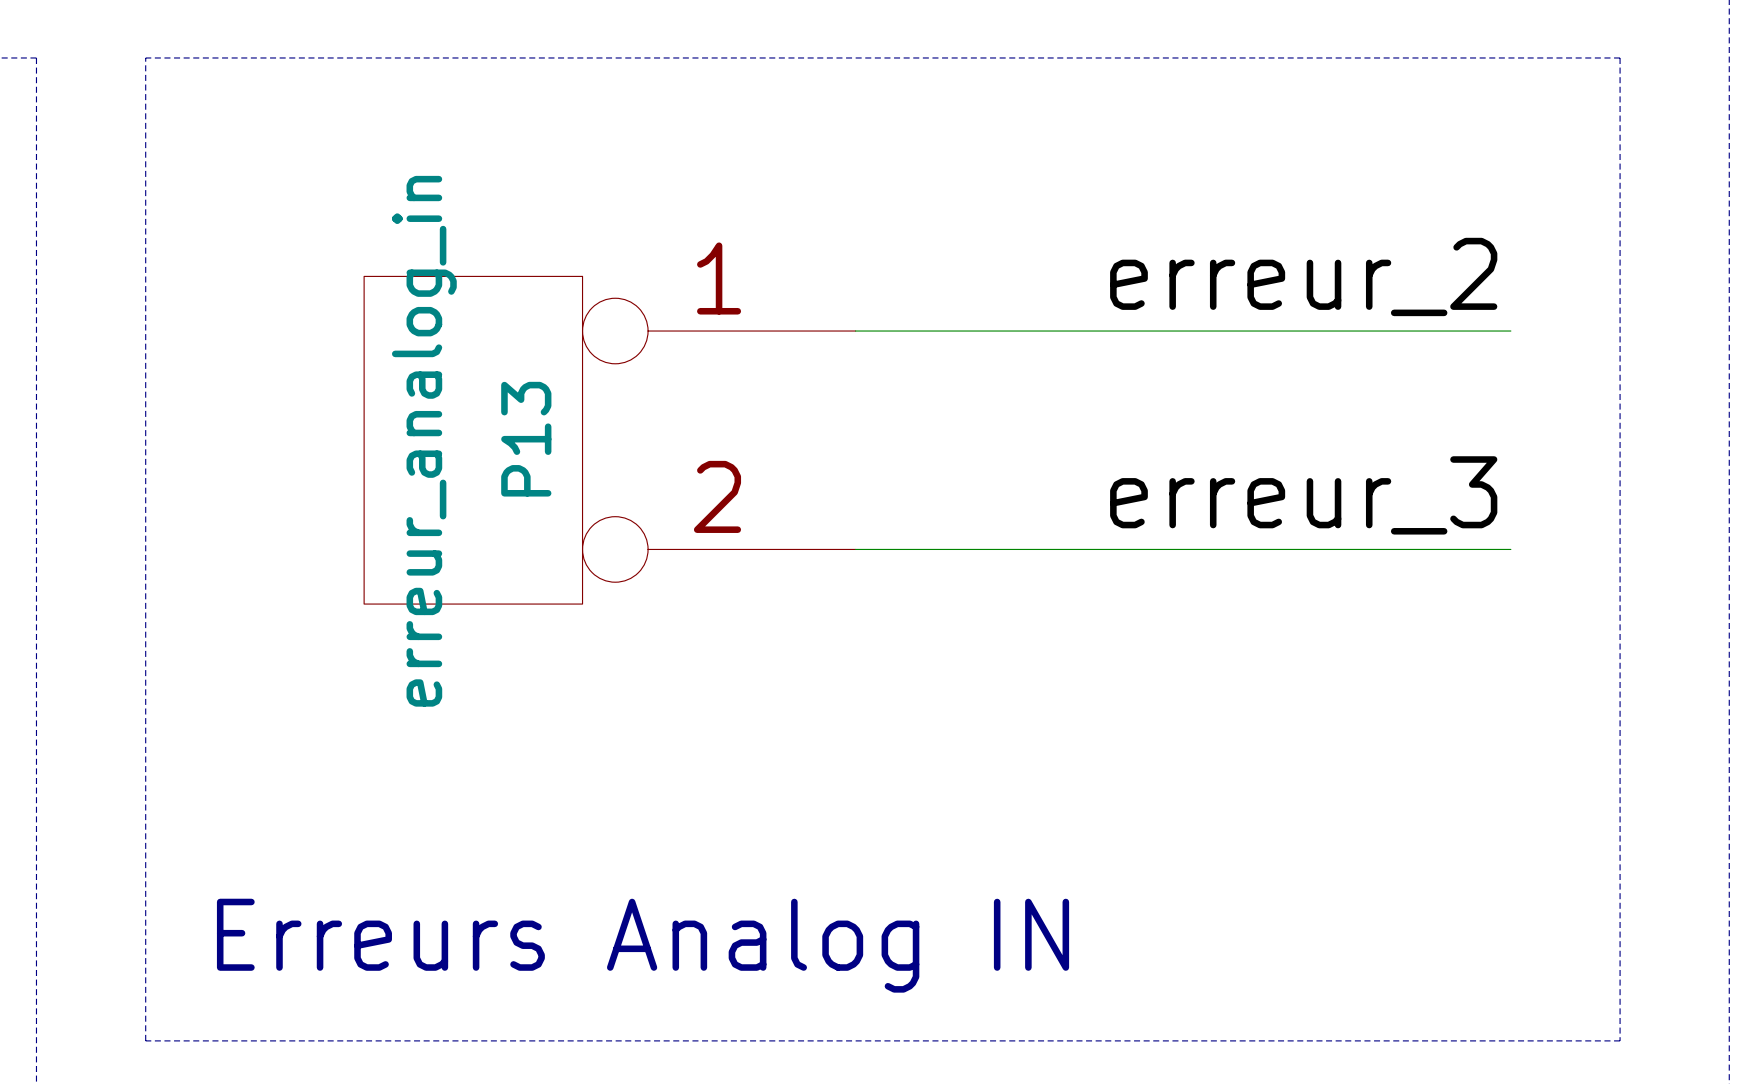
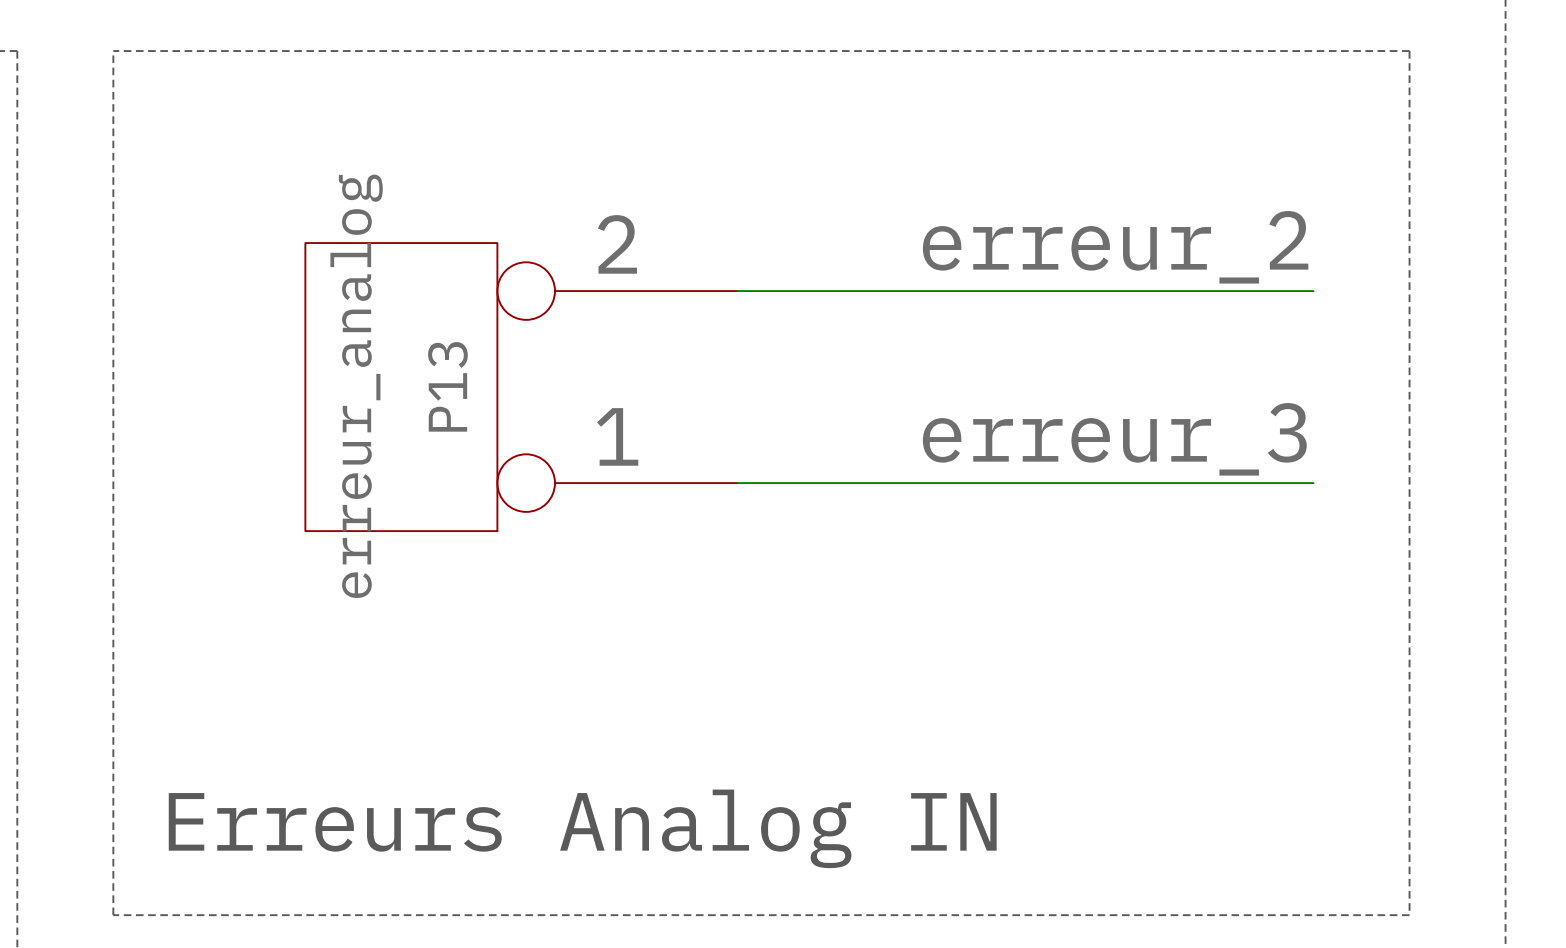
P13 flip: as is (473, 440) -> up-down (401, 387)
P13 value: erreur_analog_in (424, 441) -> erreur_analog (356, 386)

